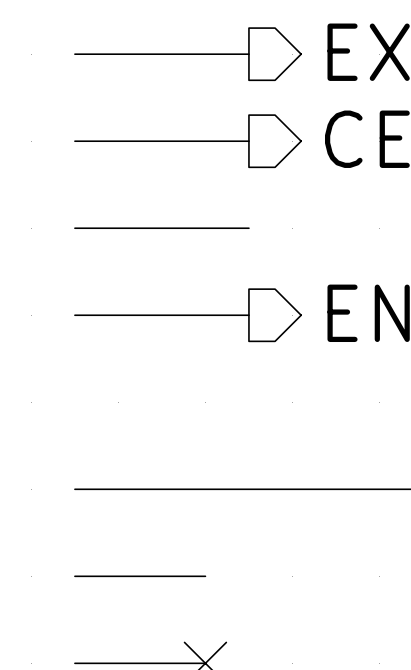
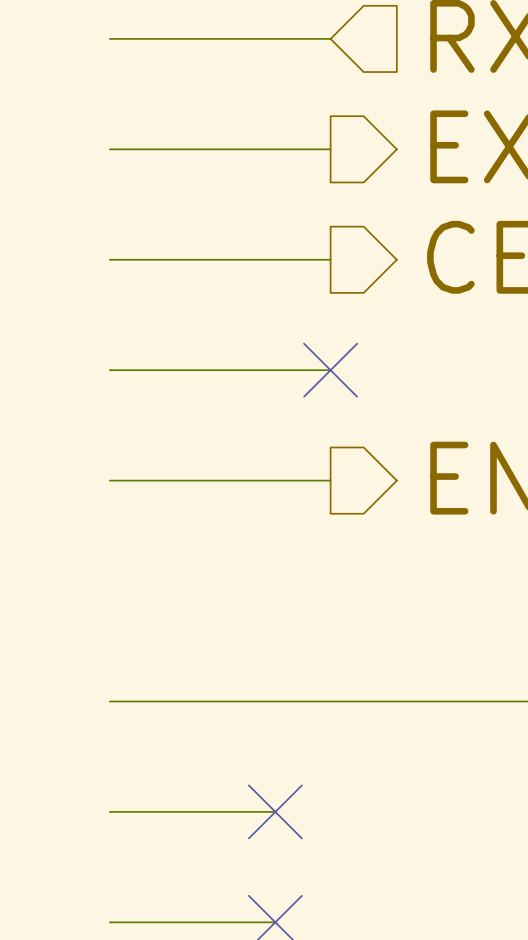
no-connect mark: none -> (330, 370)
no-connect mark: none -> (275, 811)

